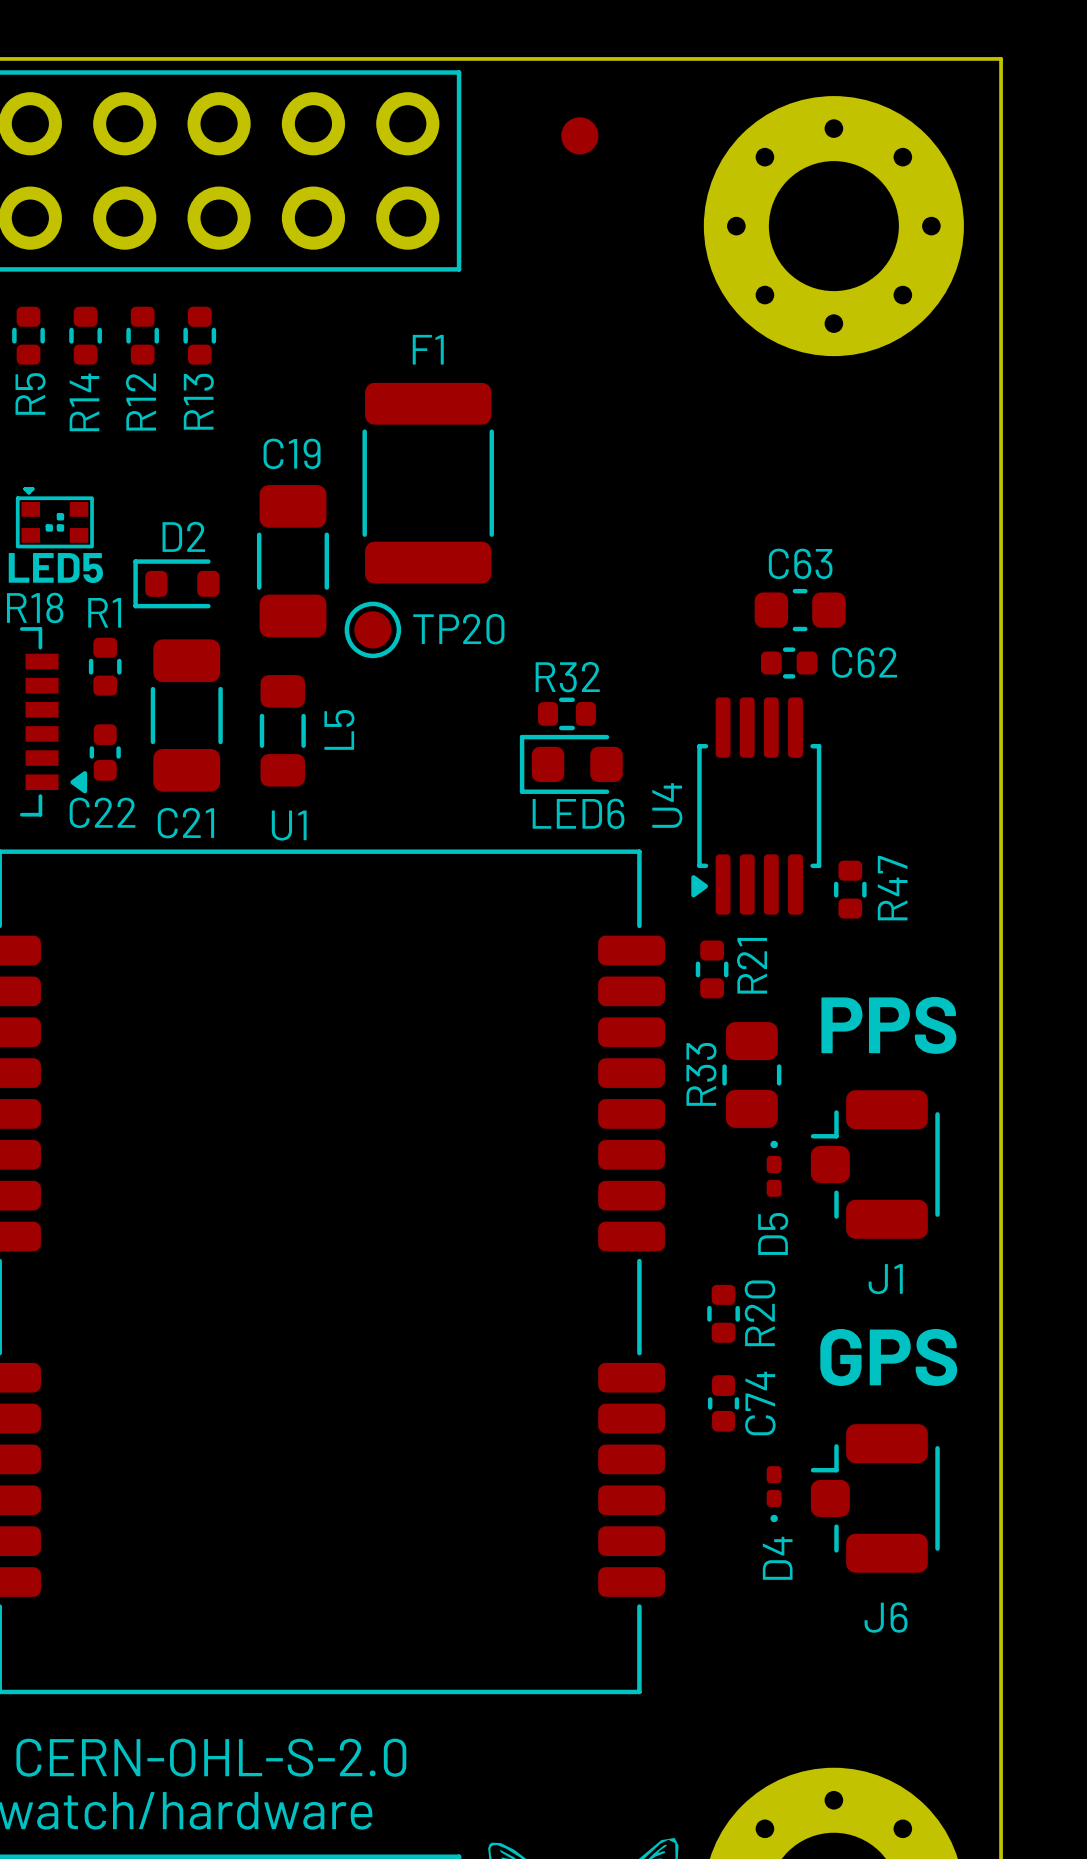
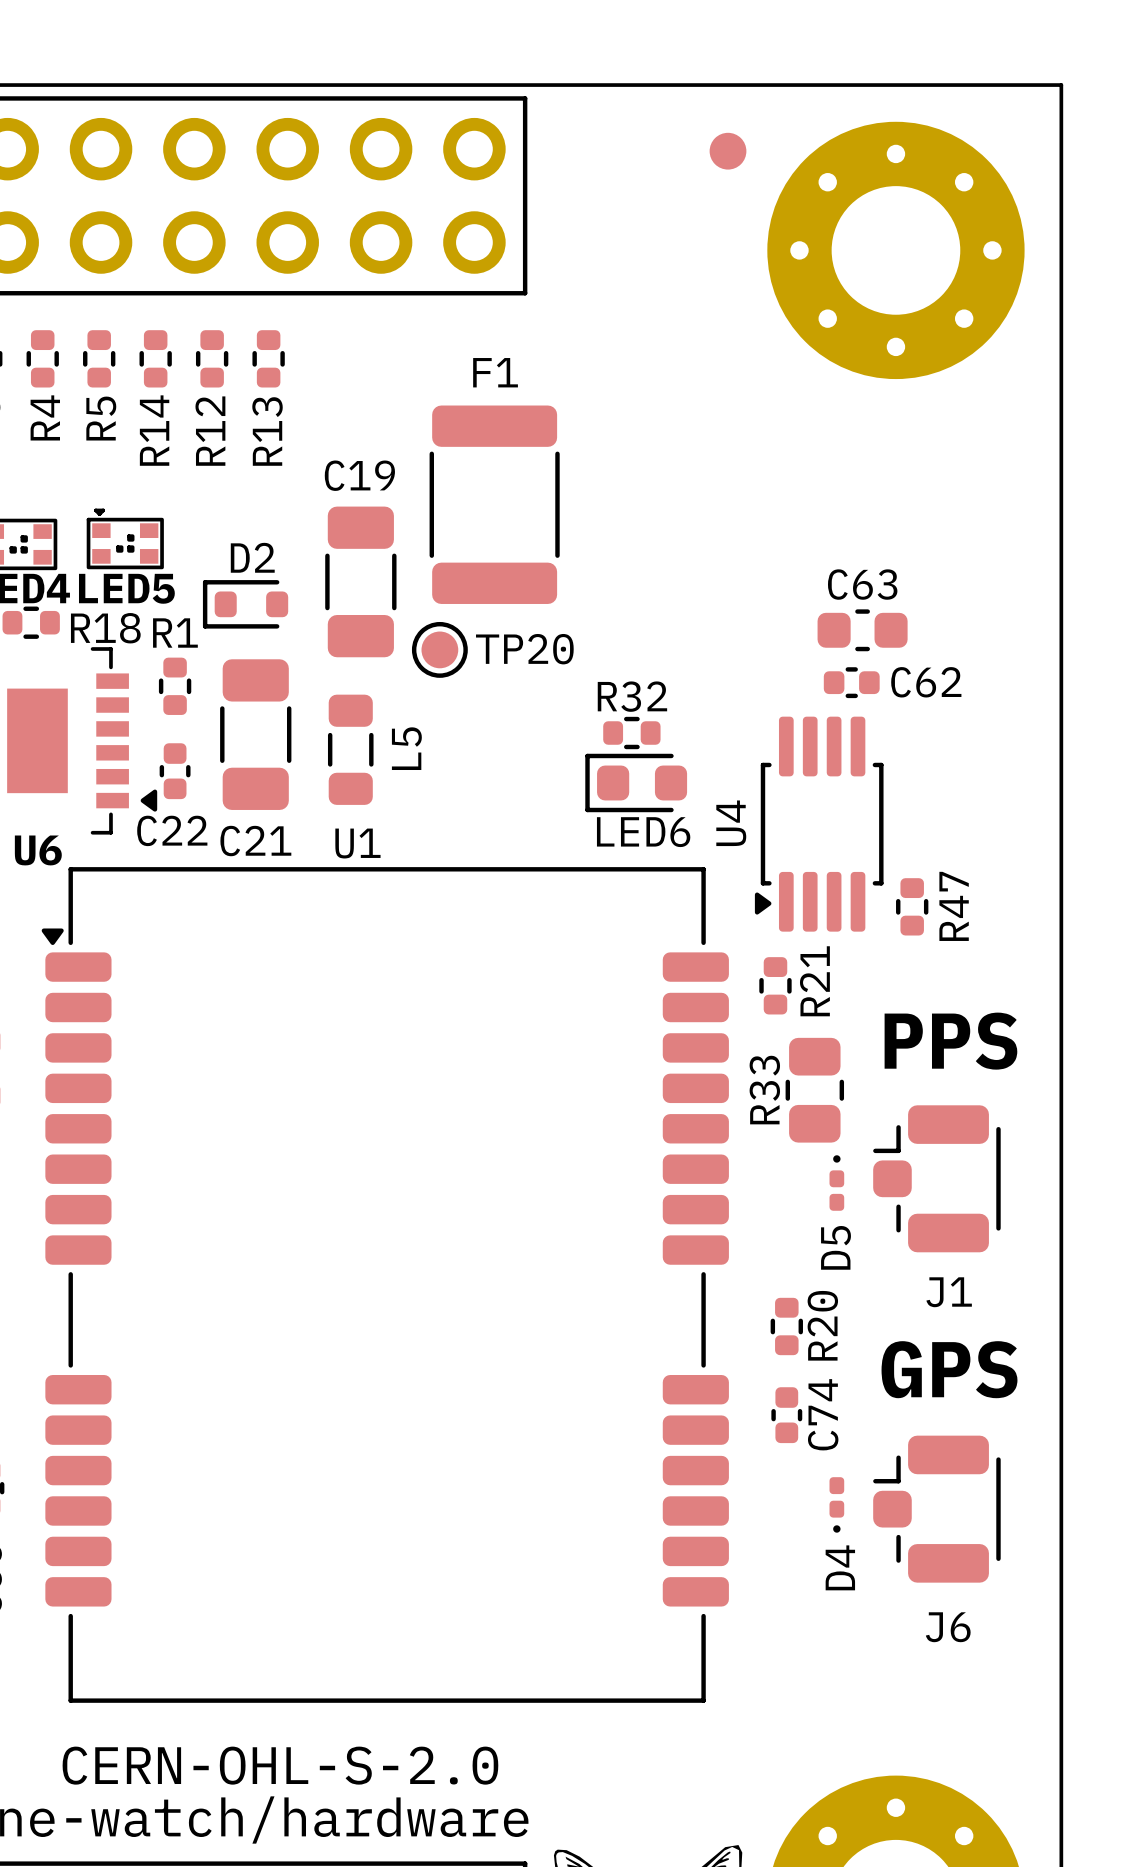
part position: (579, 135) -> (728, 151)

